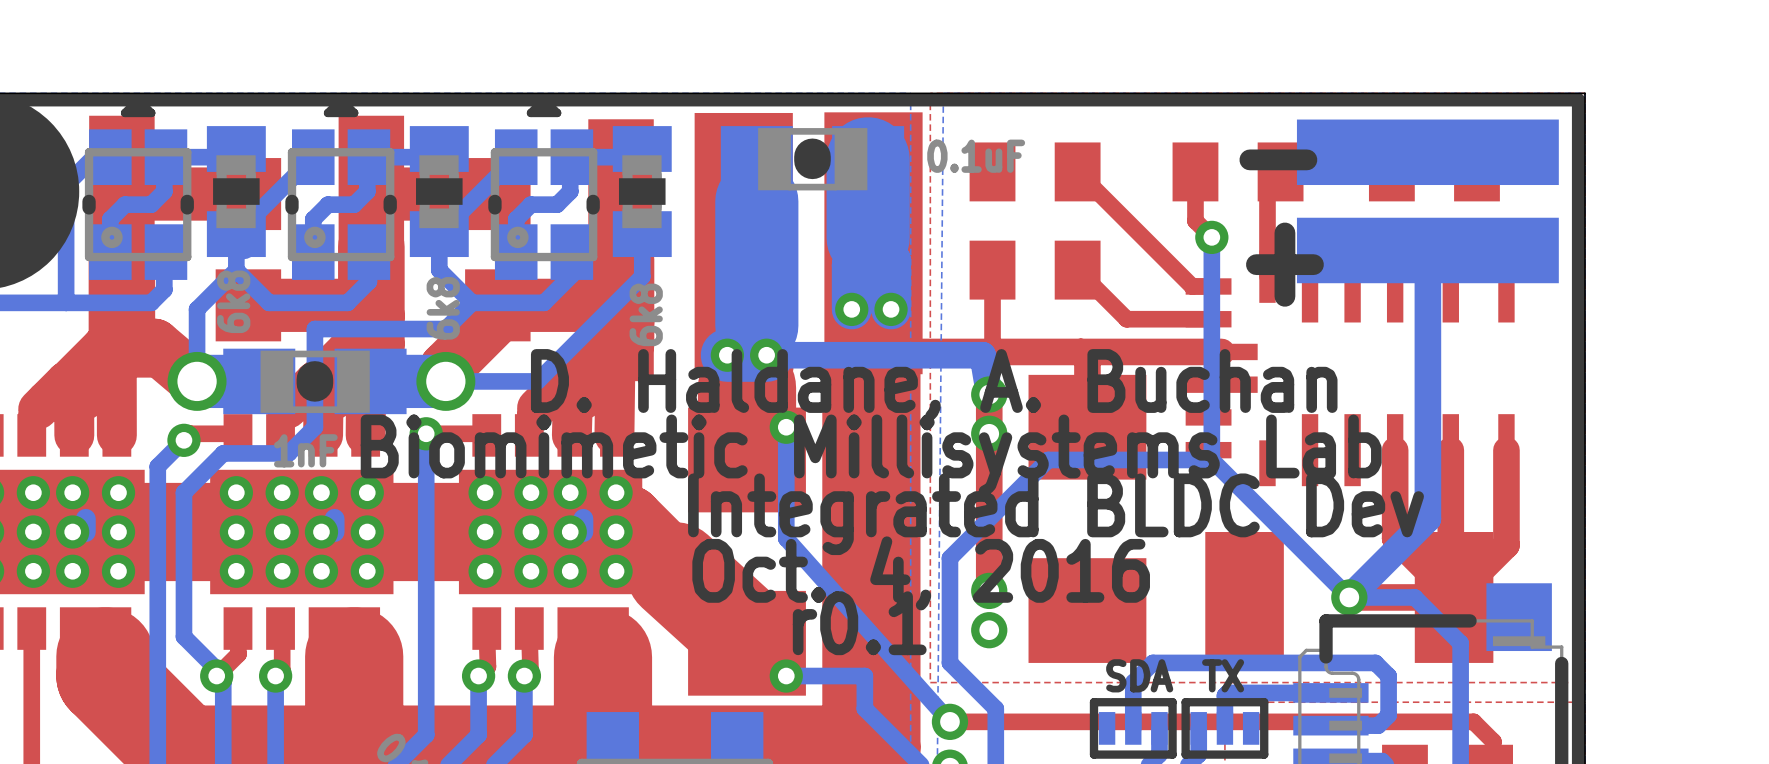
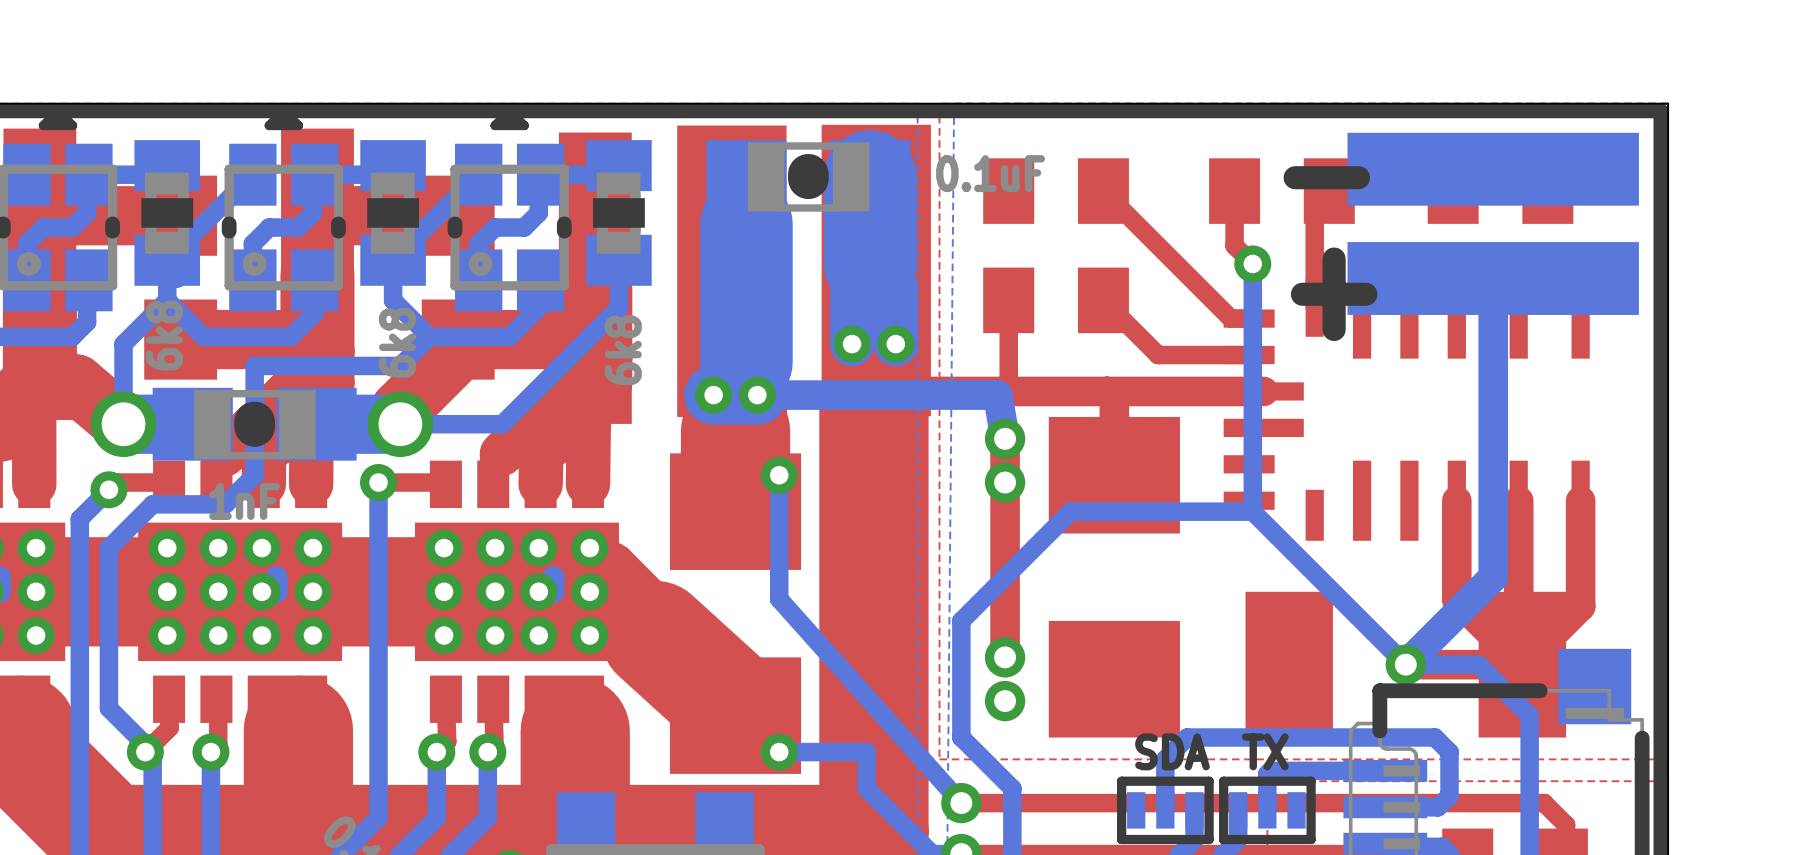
drawing: [360, 349, 1424, 656] -> none

